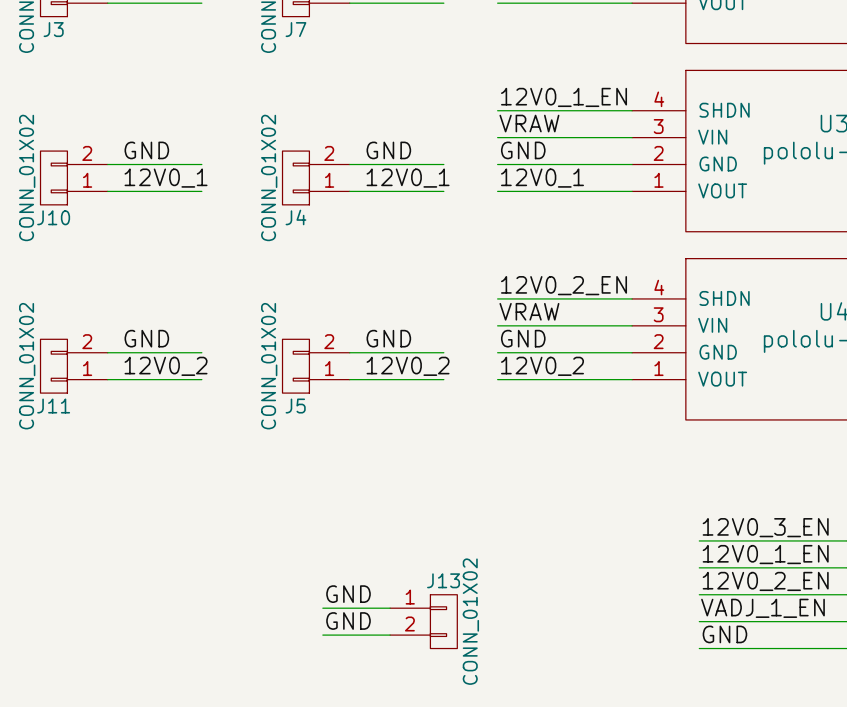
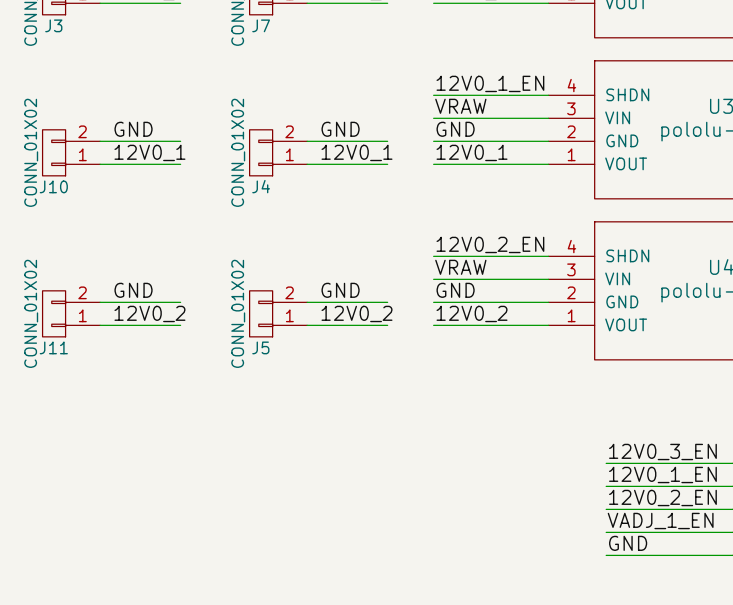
label: GND (348, 594) -> none
wire: (322, 608) (390, 608) -> none
label: GND (348, 621) -> none
J13: CONN_01X02 (423, 621) -> none
wire: (322, 635) (390, 635) -> none

